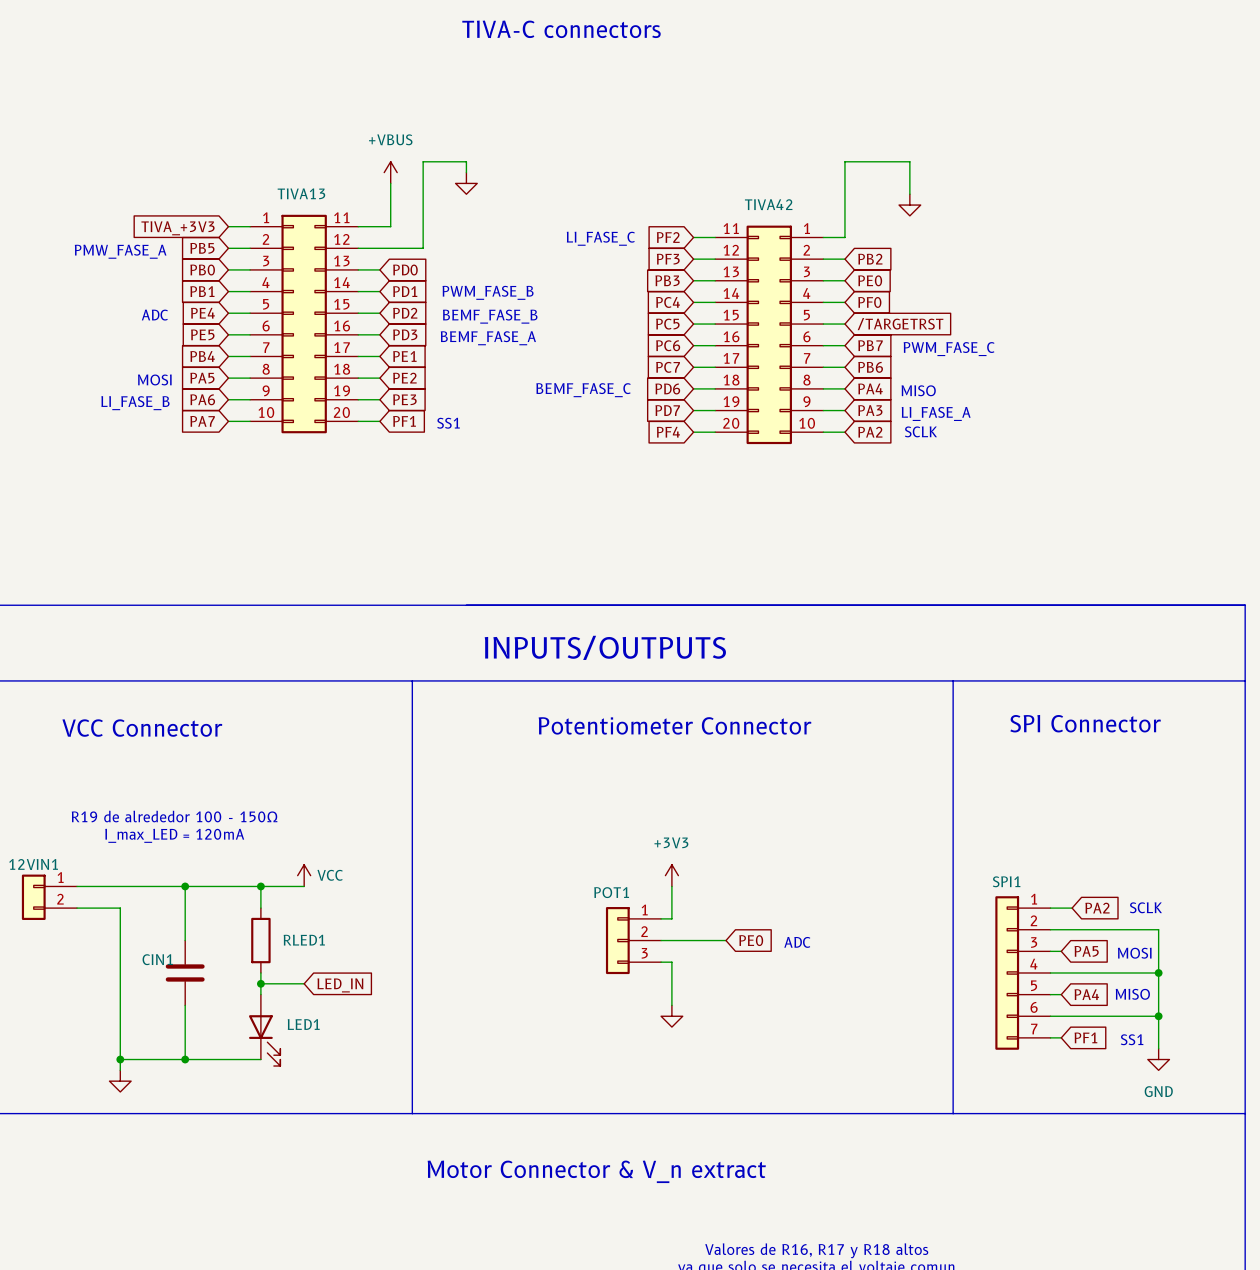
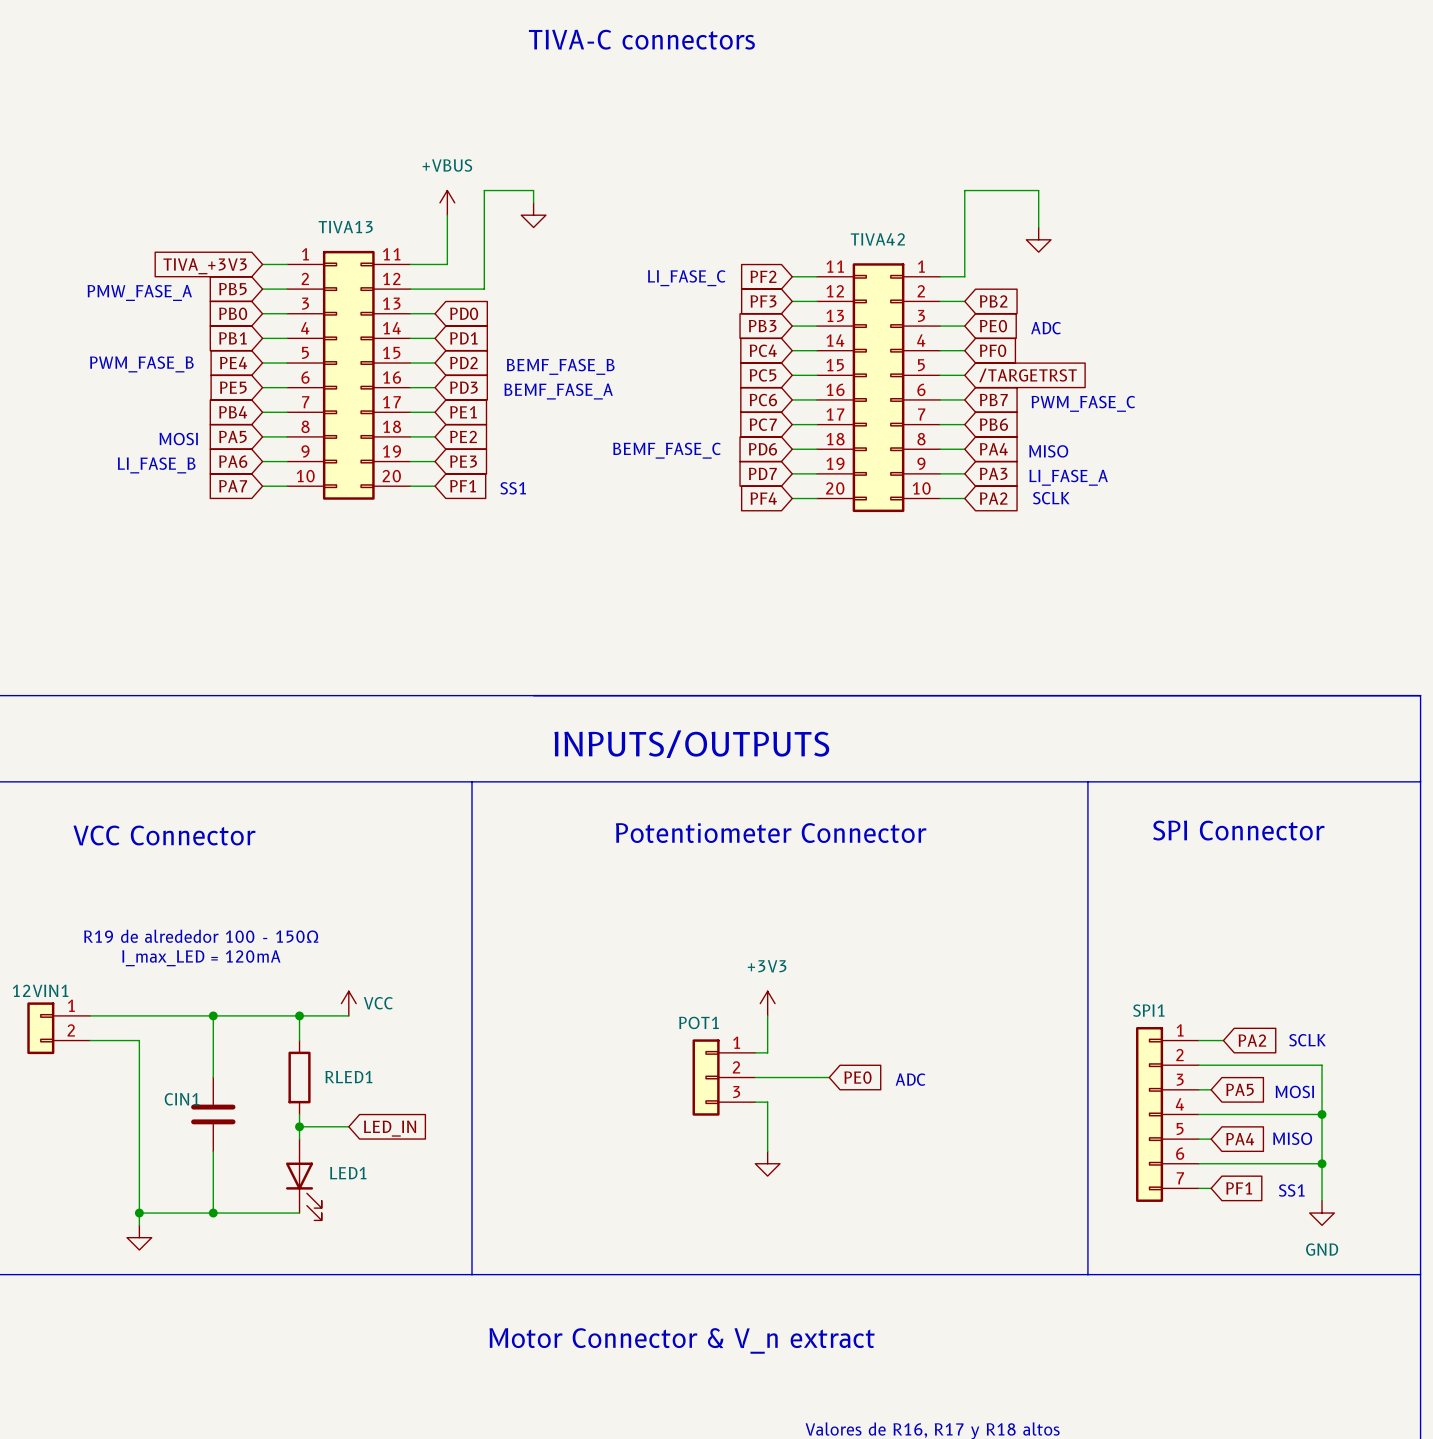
text: none -> ADC (1046, 328)
text: PWM_FASE_B (488, 292) -> none
text: none -> PWM_FASE_B (141, 364)
text: ADC (154, 315) -> none

